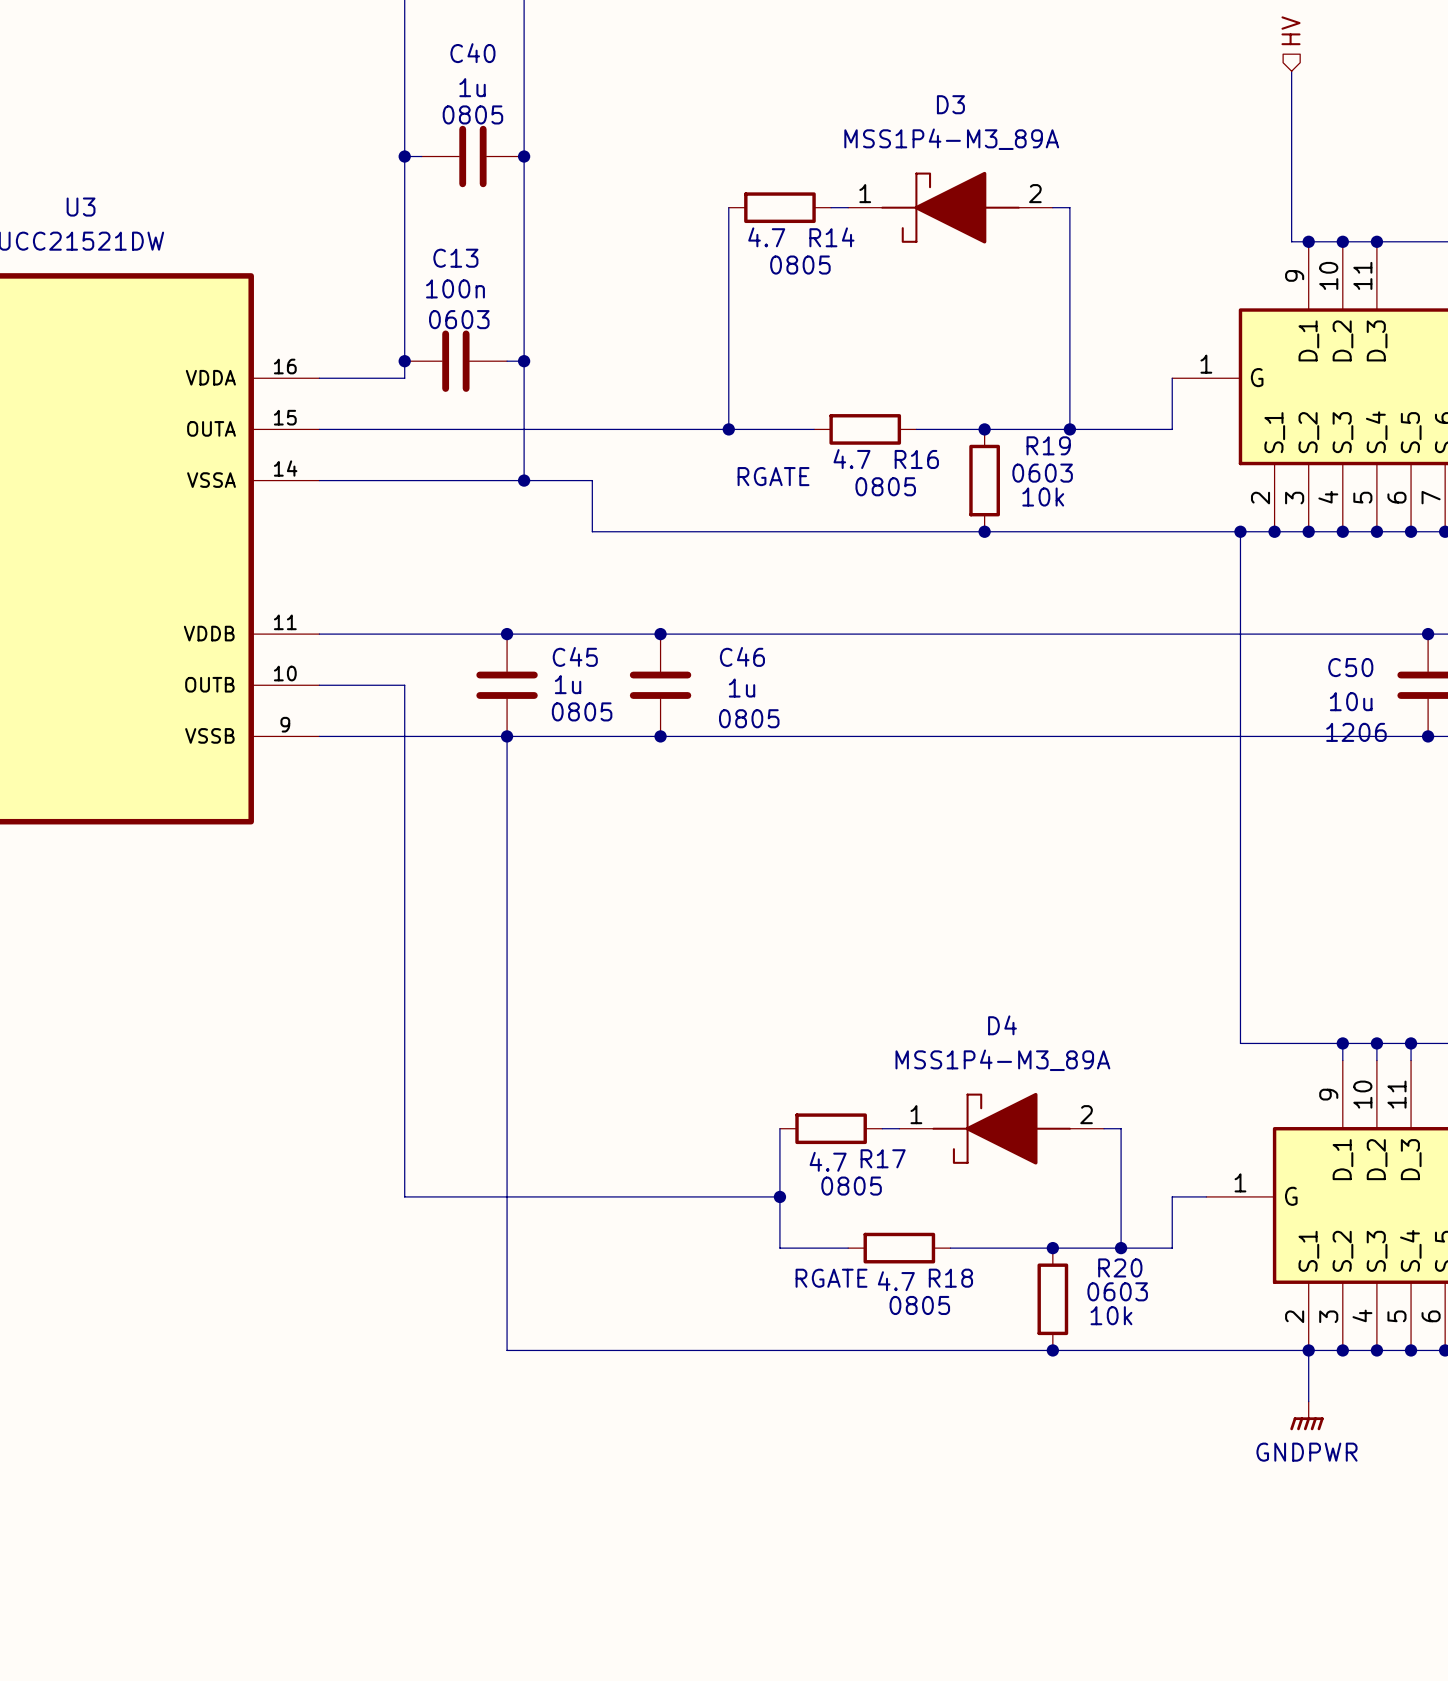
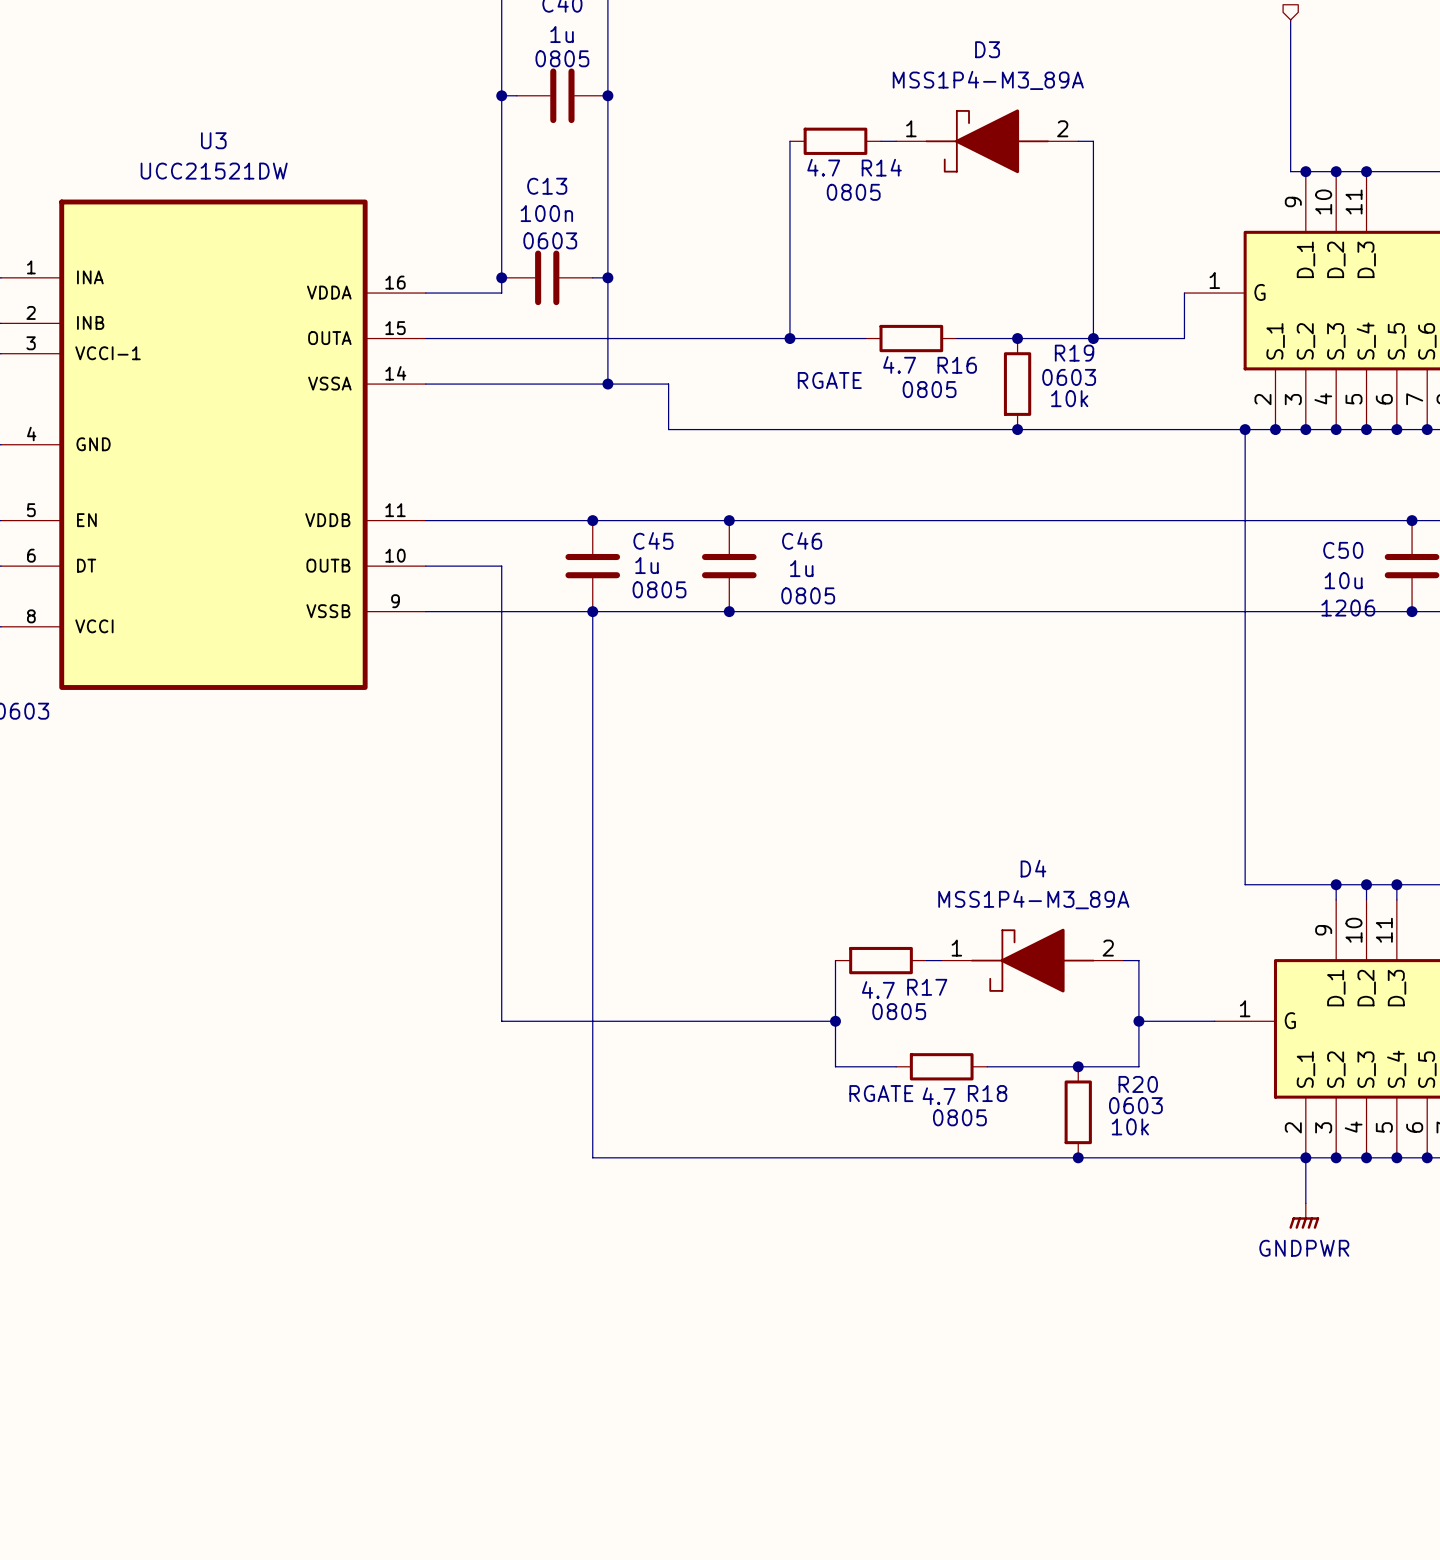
wire: (1172, 1196) (1172, 1248) (1121, 1248) -> (1184, 1021) (1138, 1021)
junction position: (1121, 1248) -> (1138, 1021)

